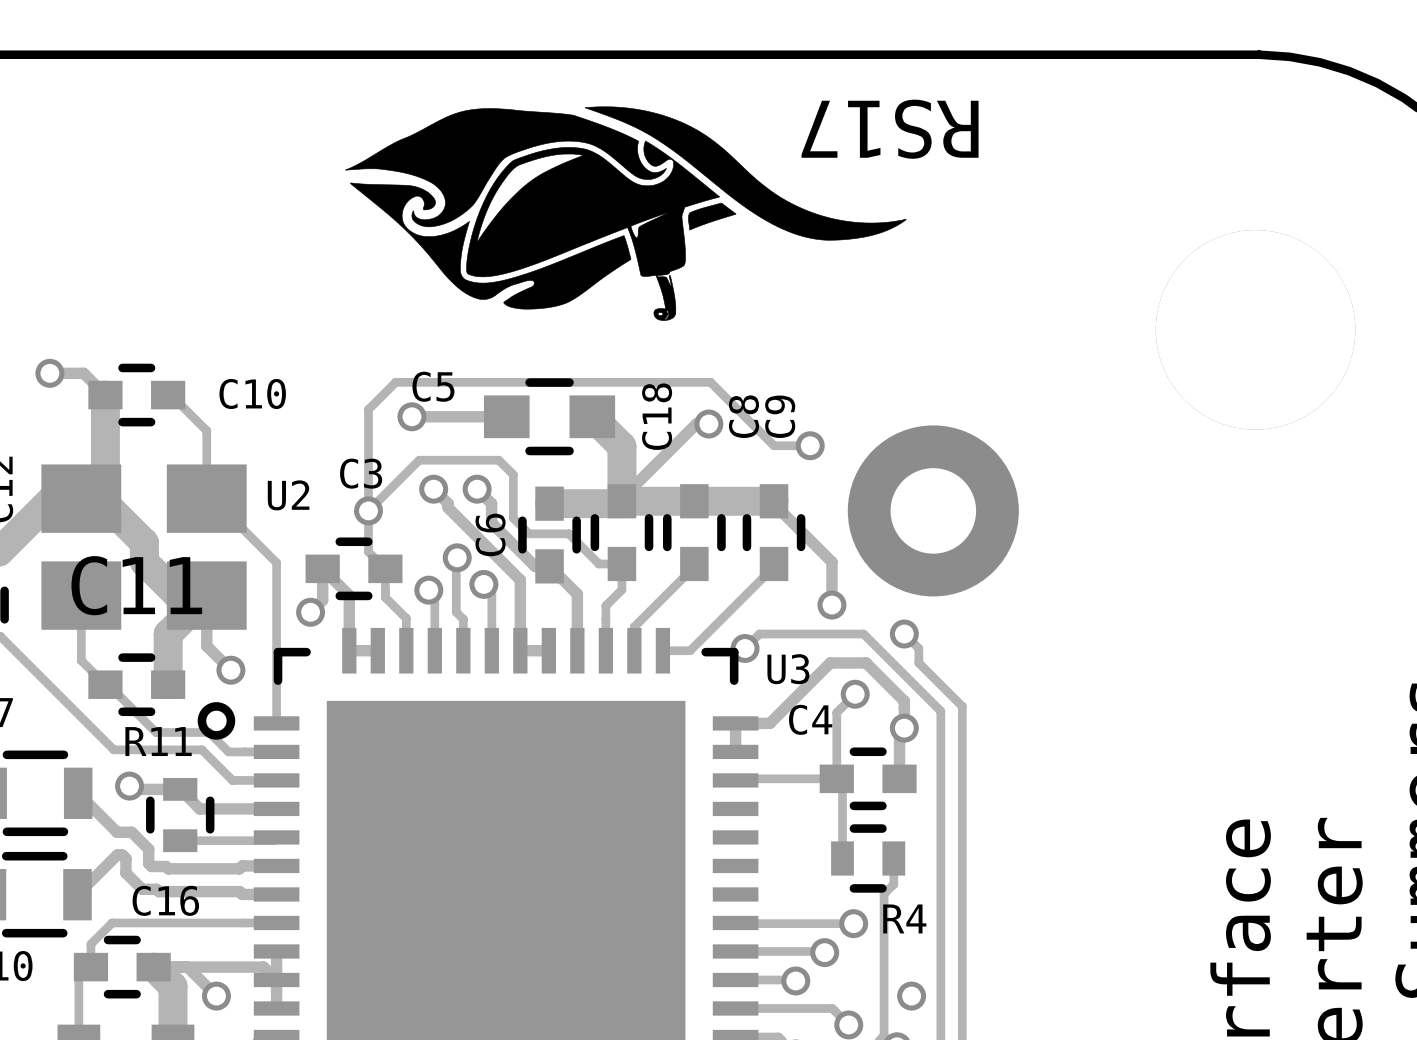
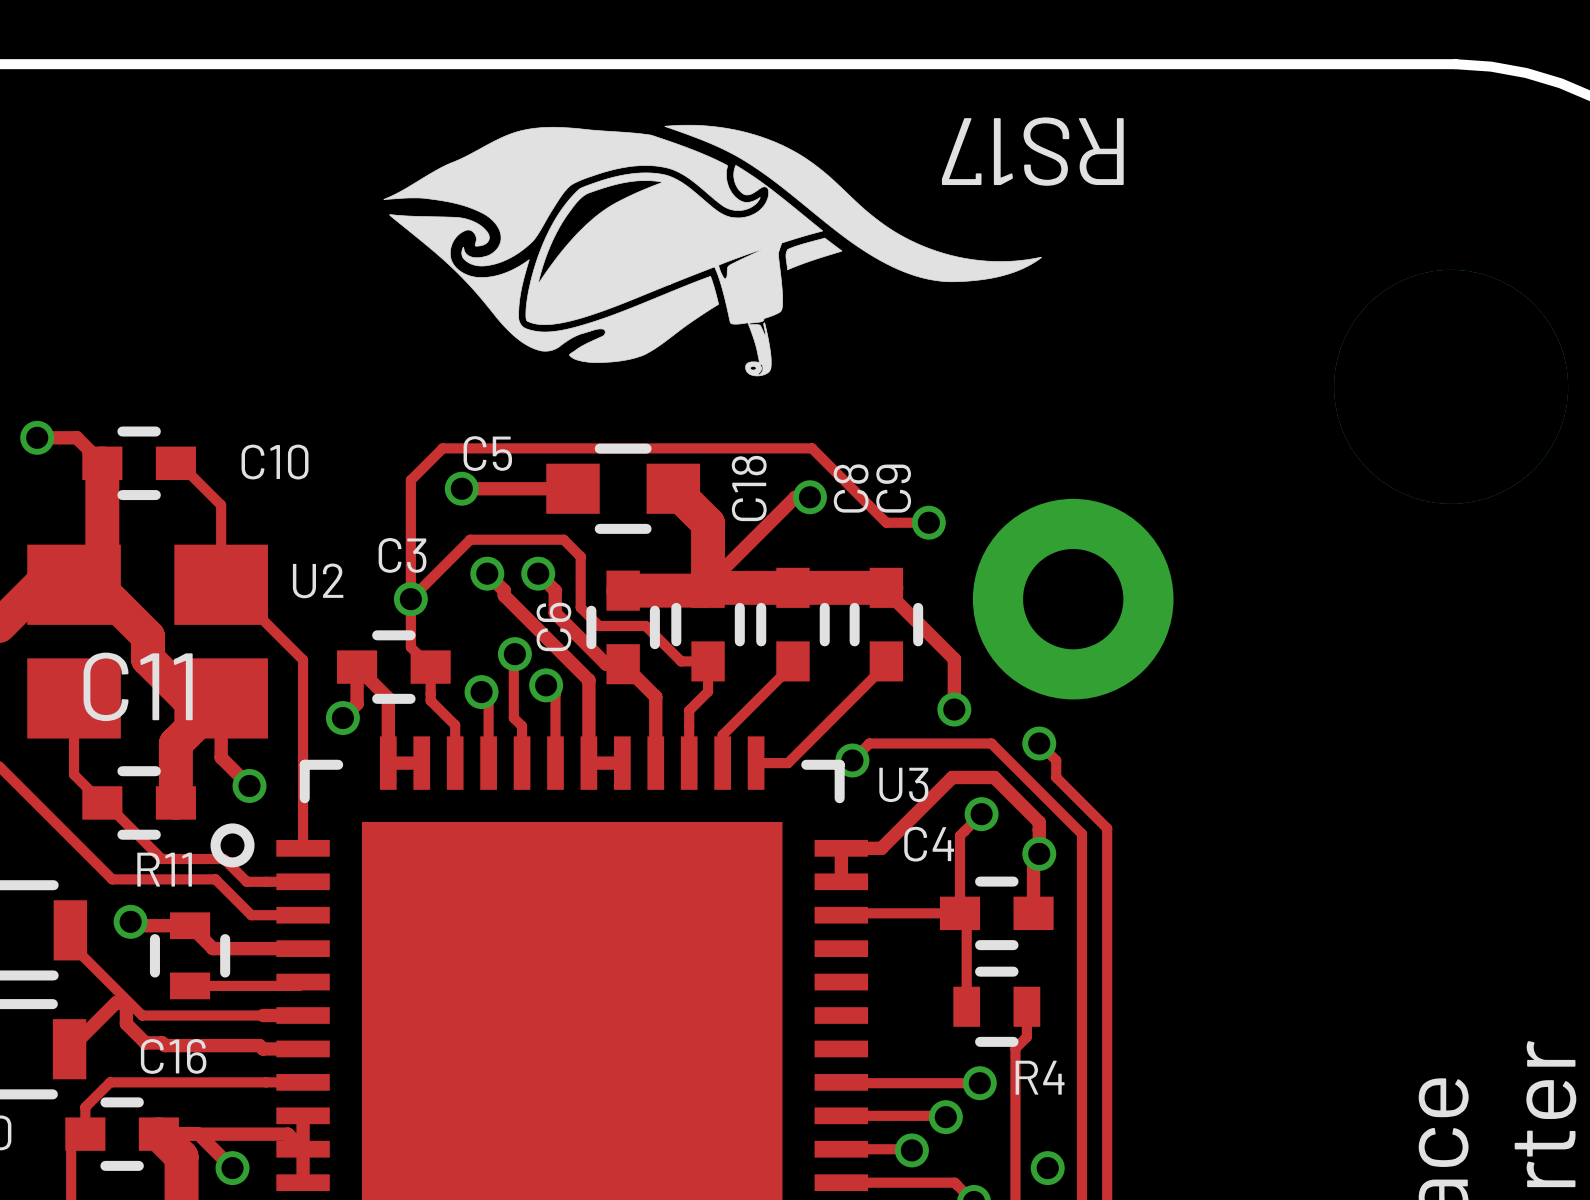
track: (78, 793) (117, 832) (131, 832) (148, 849) (148, 863) (151, 866) (165, 866) (168, 868) (239, 868) (242, 865) -> (70, 930) (70, 943) (142, 1015) (262, 1015)

